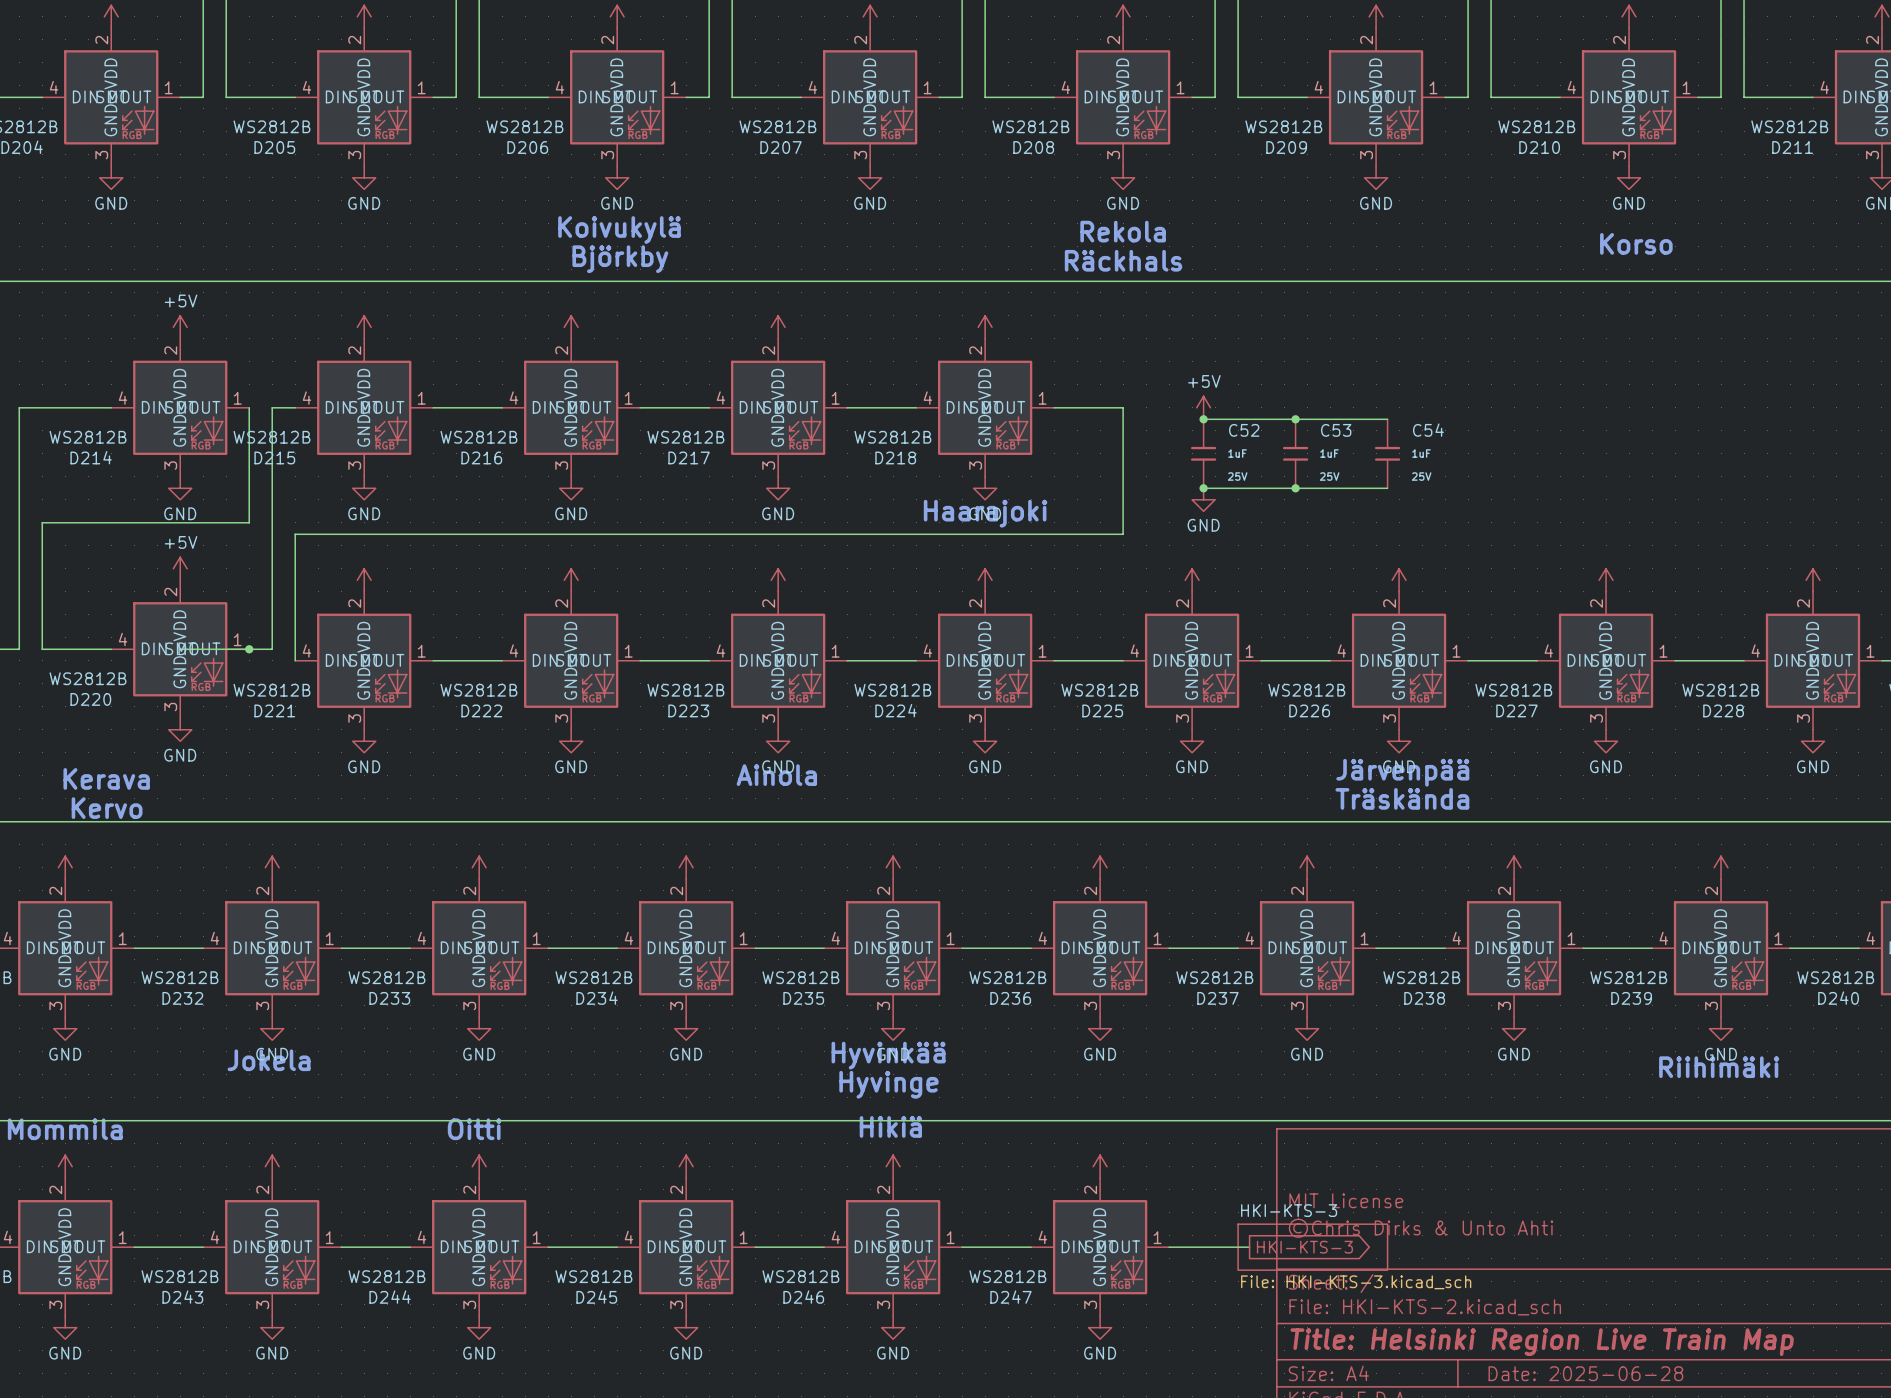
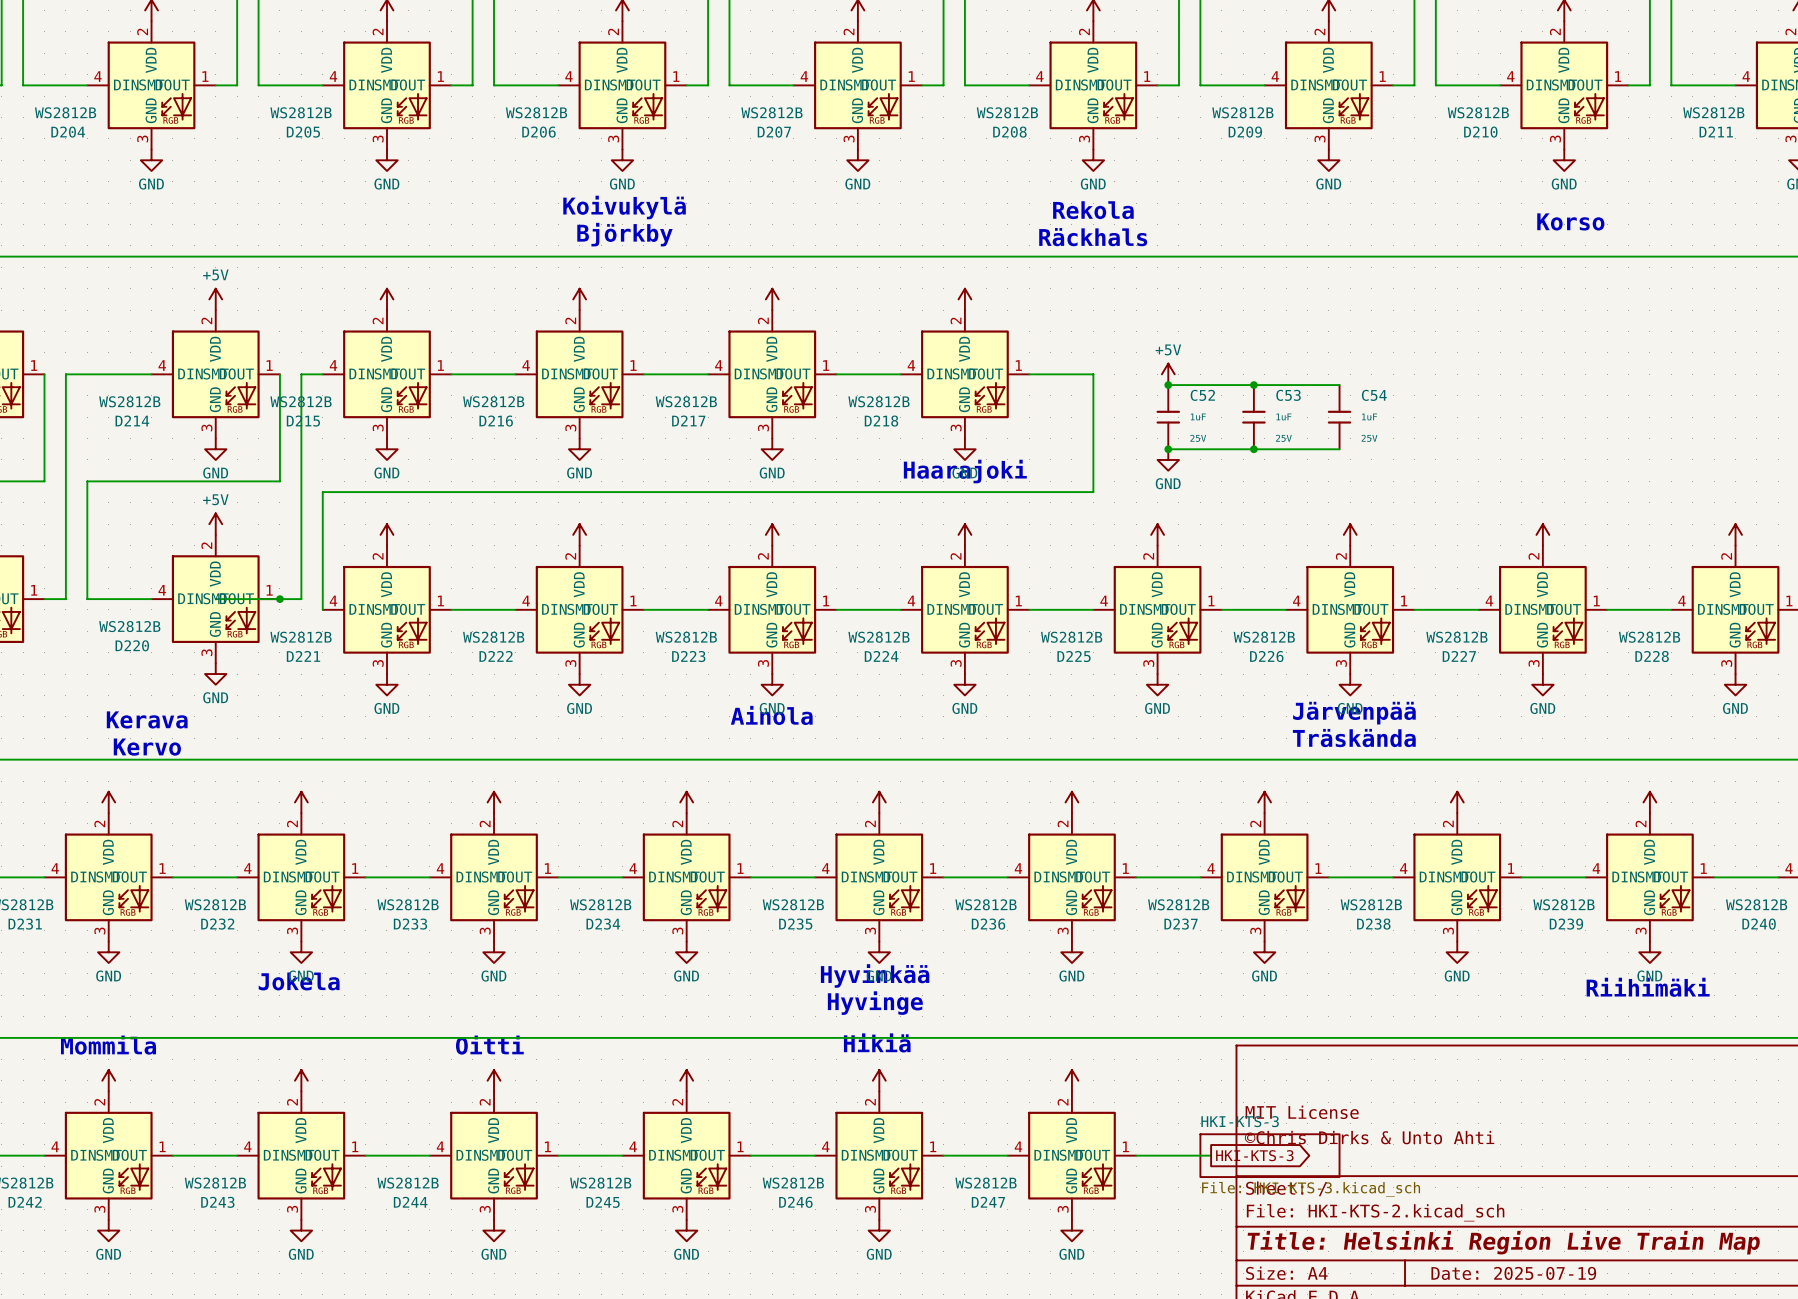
title block: Date: 2025-06-28 (1585, 1373) -> Date: 2025-07-19 (1513, 1273)

